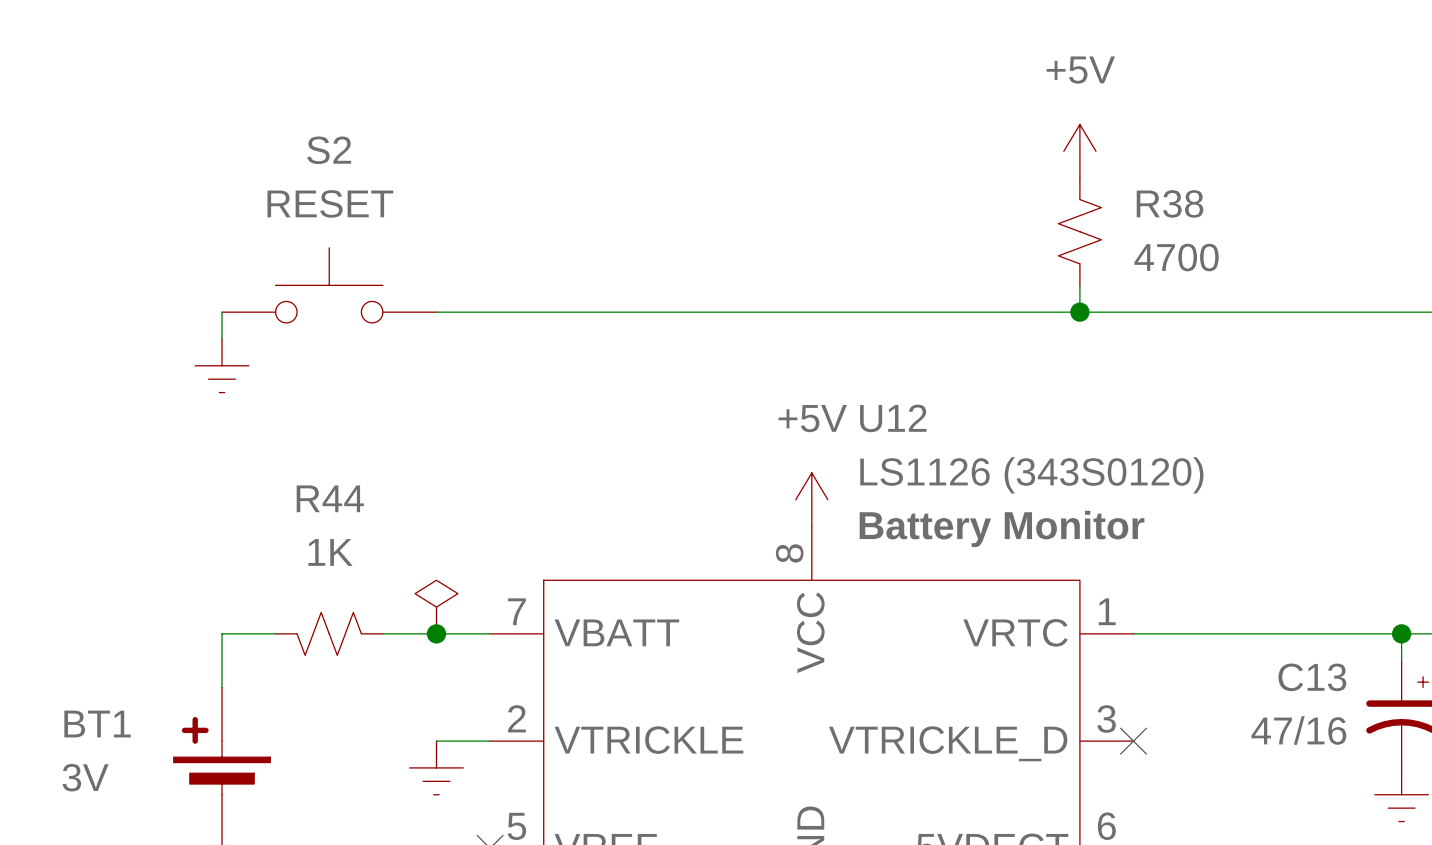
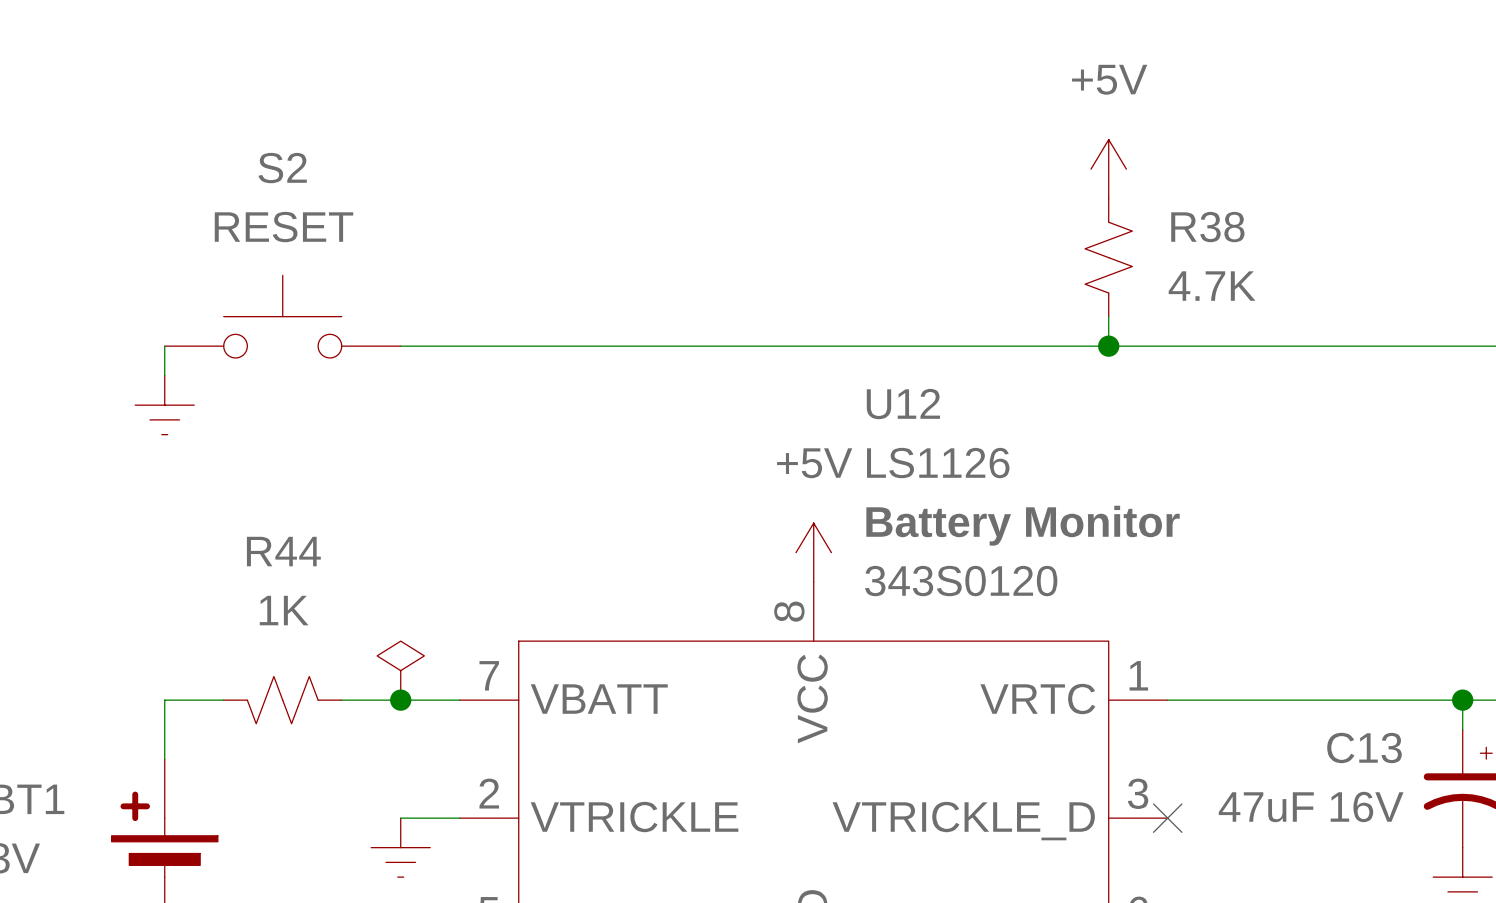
R38 value: 4700 (1176, 257) -> 4.7K (1212, 286)
U12 name position: U12 (893, 418) -> U12 (903, 404)
U12 value: LS1126 (343S0120) (1031, 475) -> LS1126 (938, 463)
U12 text: none -> 343S0120 (961, 581)
U12 text position: Battery Monitor (1002, 528) -> Battery Monitor (1023, 525)
C13 value: 47/16 (1298, 730) -> 47uF 16V (1311, 806)

